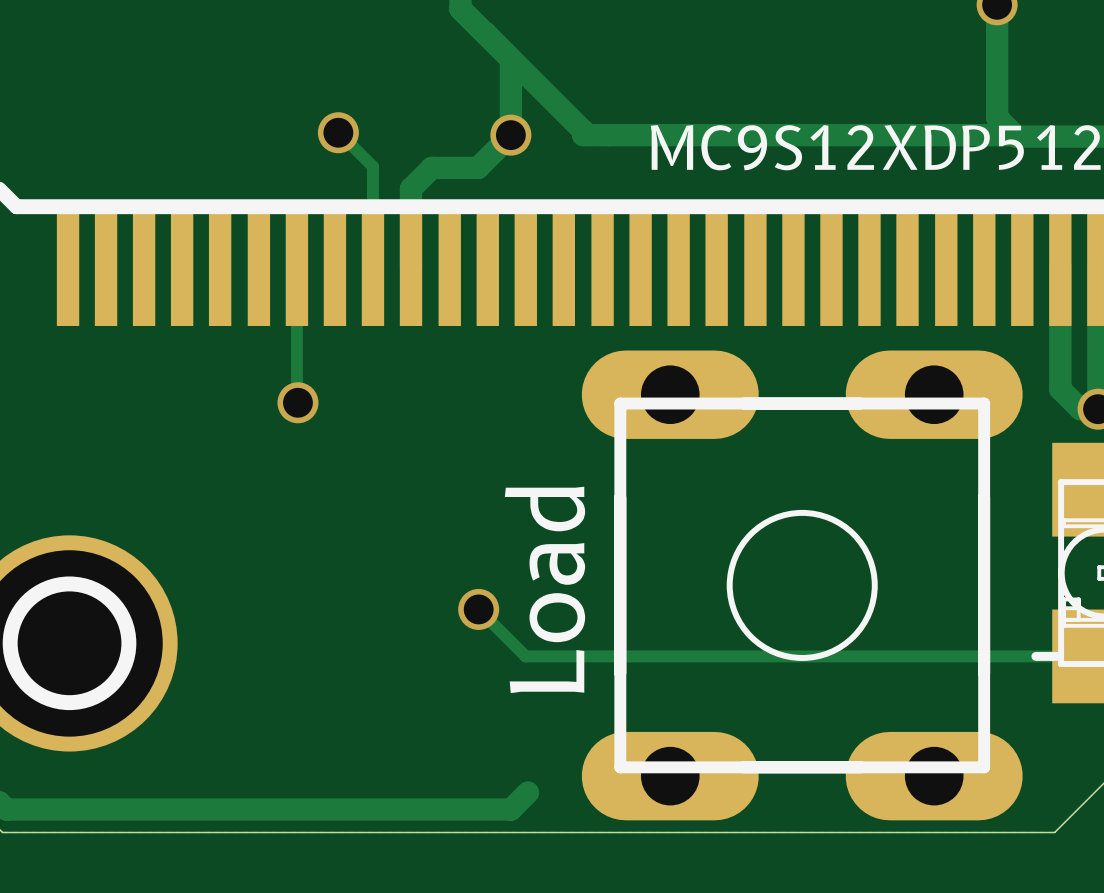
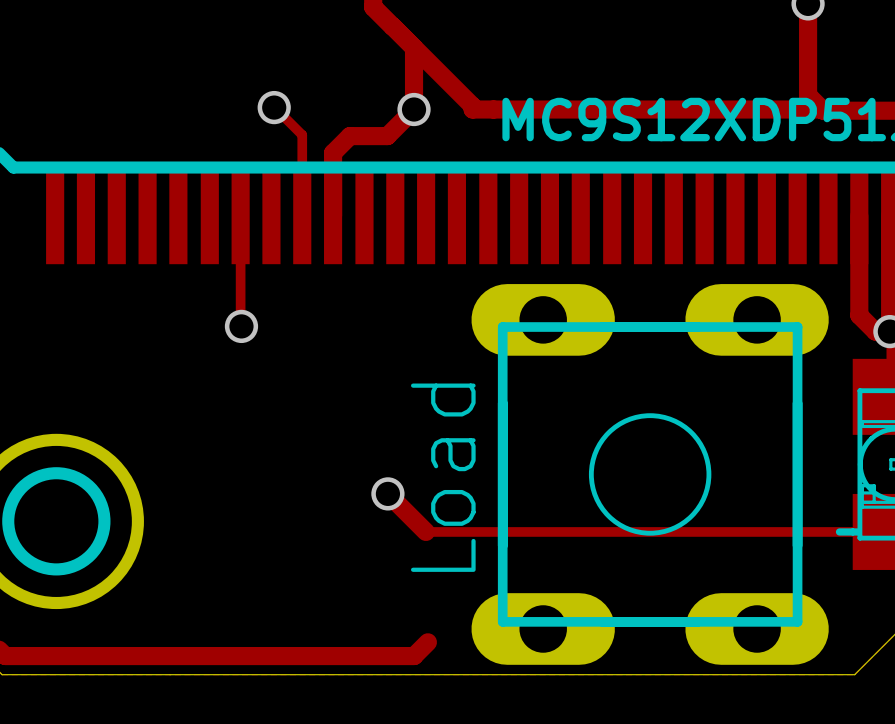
track width: thin (478, 609) (525, 656) -> thick (387, 493) (425, 531)

